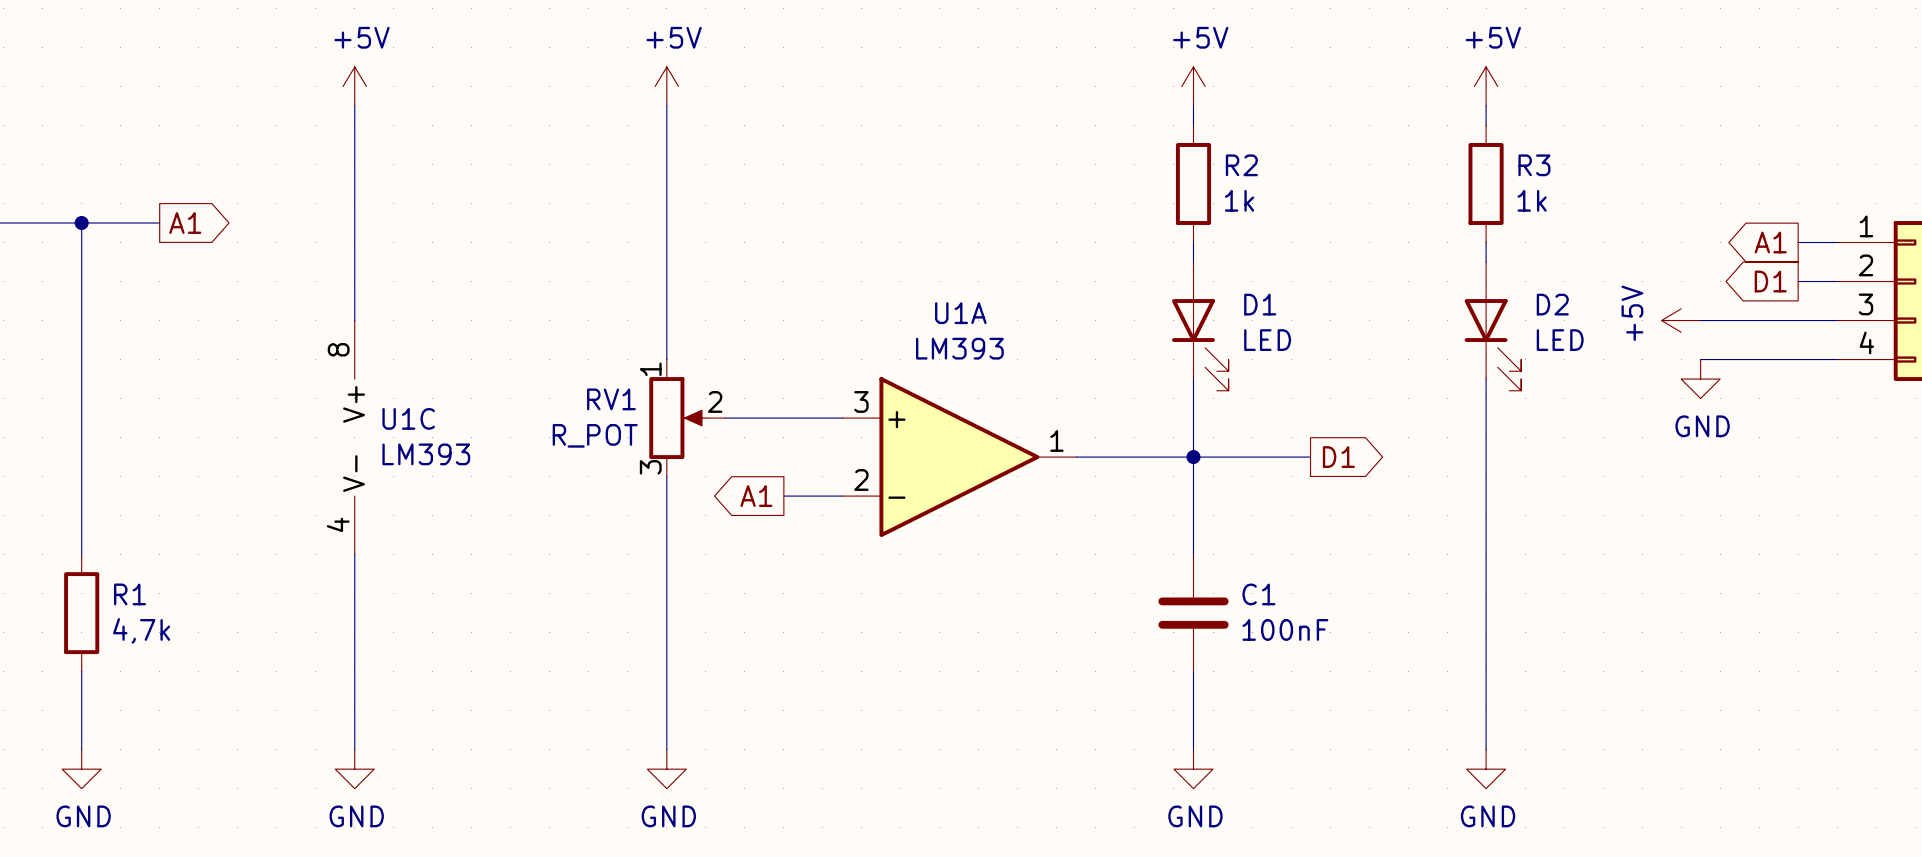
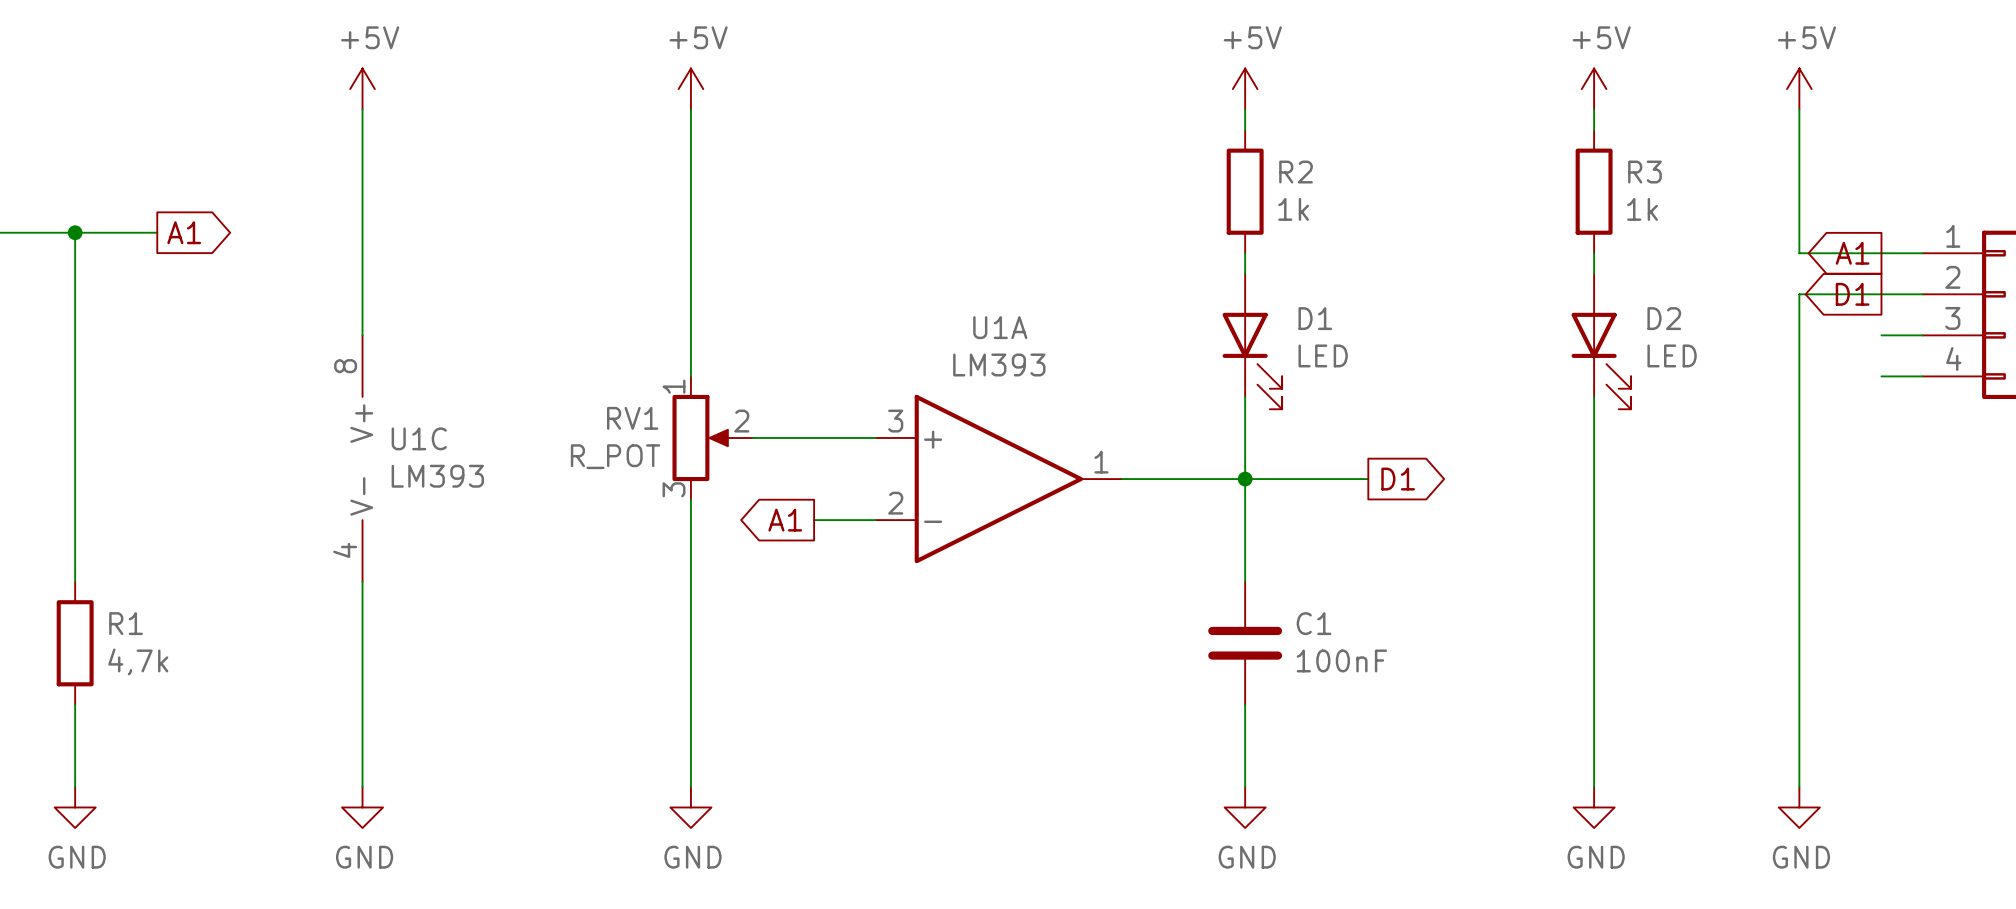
power symbol position: +5V (1486, 86) -> +5V (1594, 89)
power symbol: none -> +5V (1799, 89)
wire: (1486, 105) (1486, 125) -> (1594, 109) (1594, 130)
wire: none -> (1799, 109) (1799, 253) (1881, 253)
R3 position: (1486, 183) -> (1594, 191)
wire: (1486, 242) (1486, 262) -> (1594, 253) (1594, 273)
wire: none -> (1881, 294) (1799, 294) (1799, 786)
power symbol: +5V (1681, 320) -> none
wire: (1700, 320) (1798, 320) -> none
D2 position: (1492, 326) -> (1601, 341)
wire: (1700, 359) (1798, 359) -> none
wire: (1486, 379) (1486, 749) -> (1594, 396) (1594, 786)
power symbol: GND (1700, 379) -> none
power symbol position: GND (1486, 769) -> GND (1594, 807)
power symbol: none -> GND (1799, 807)

